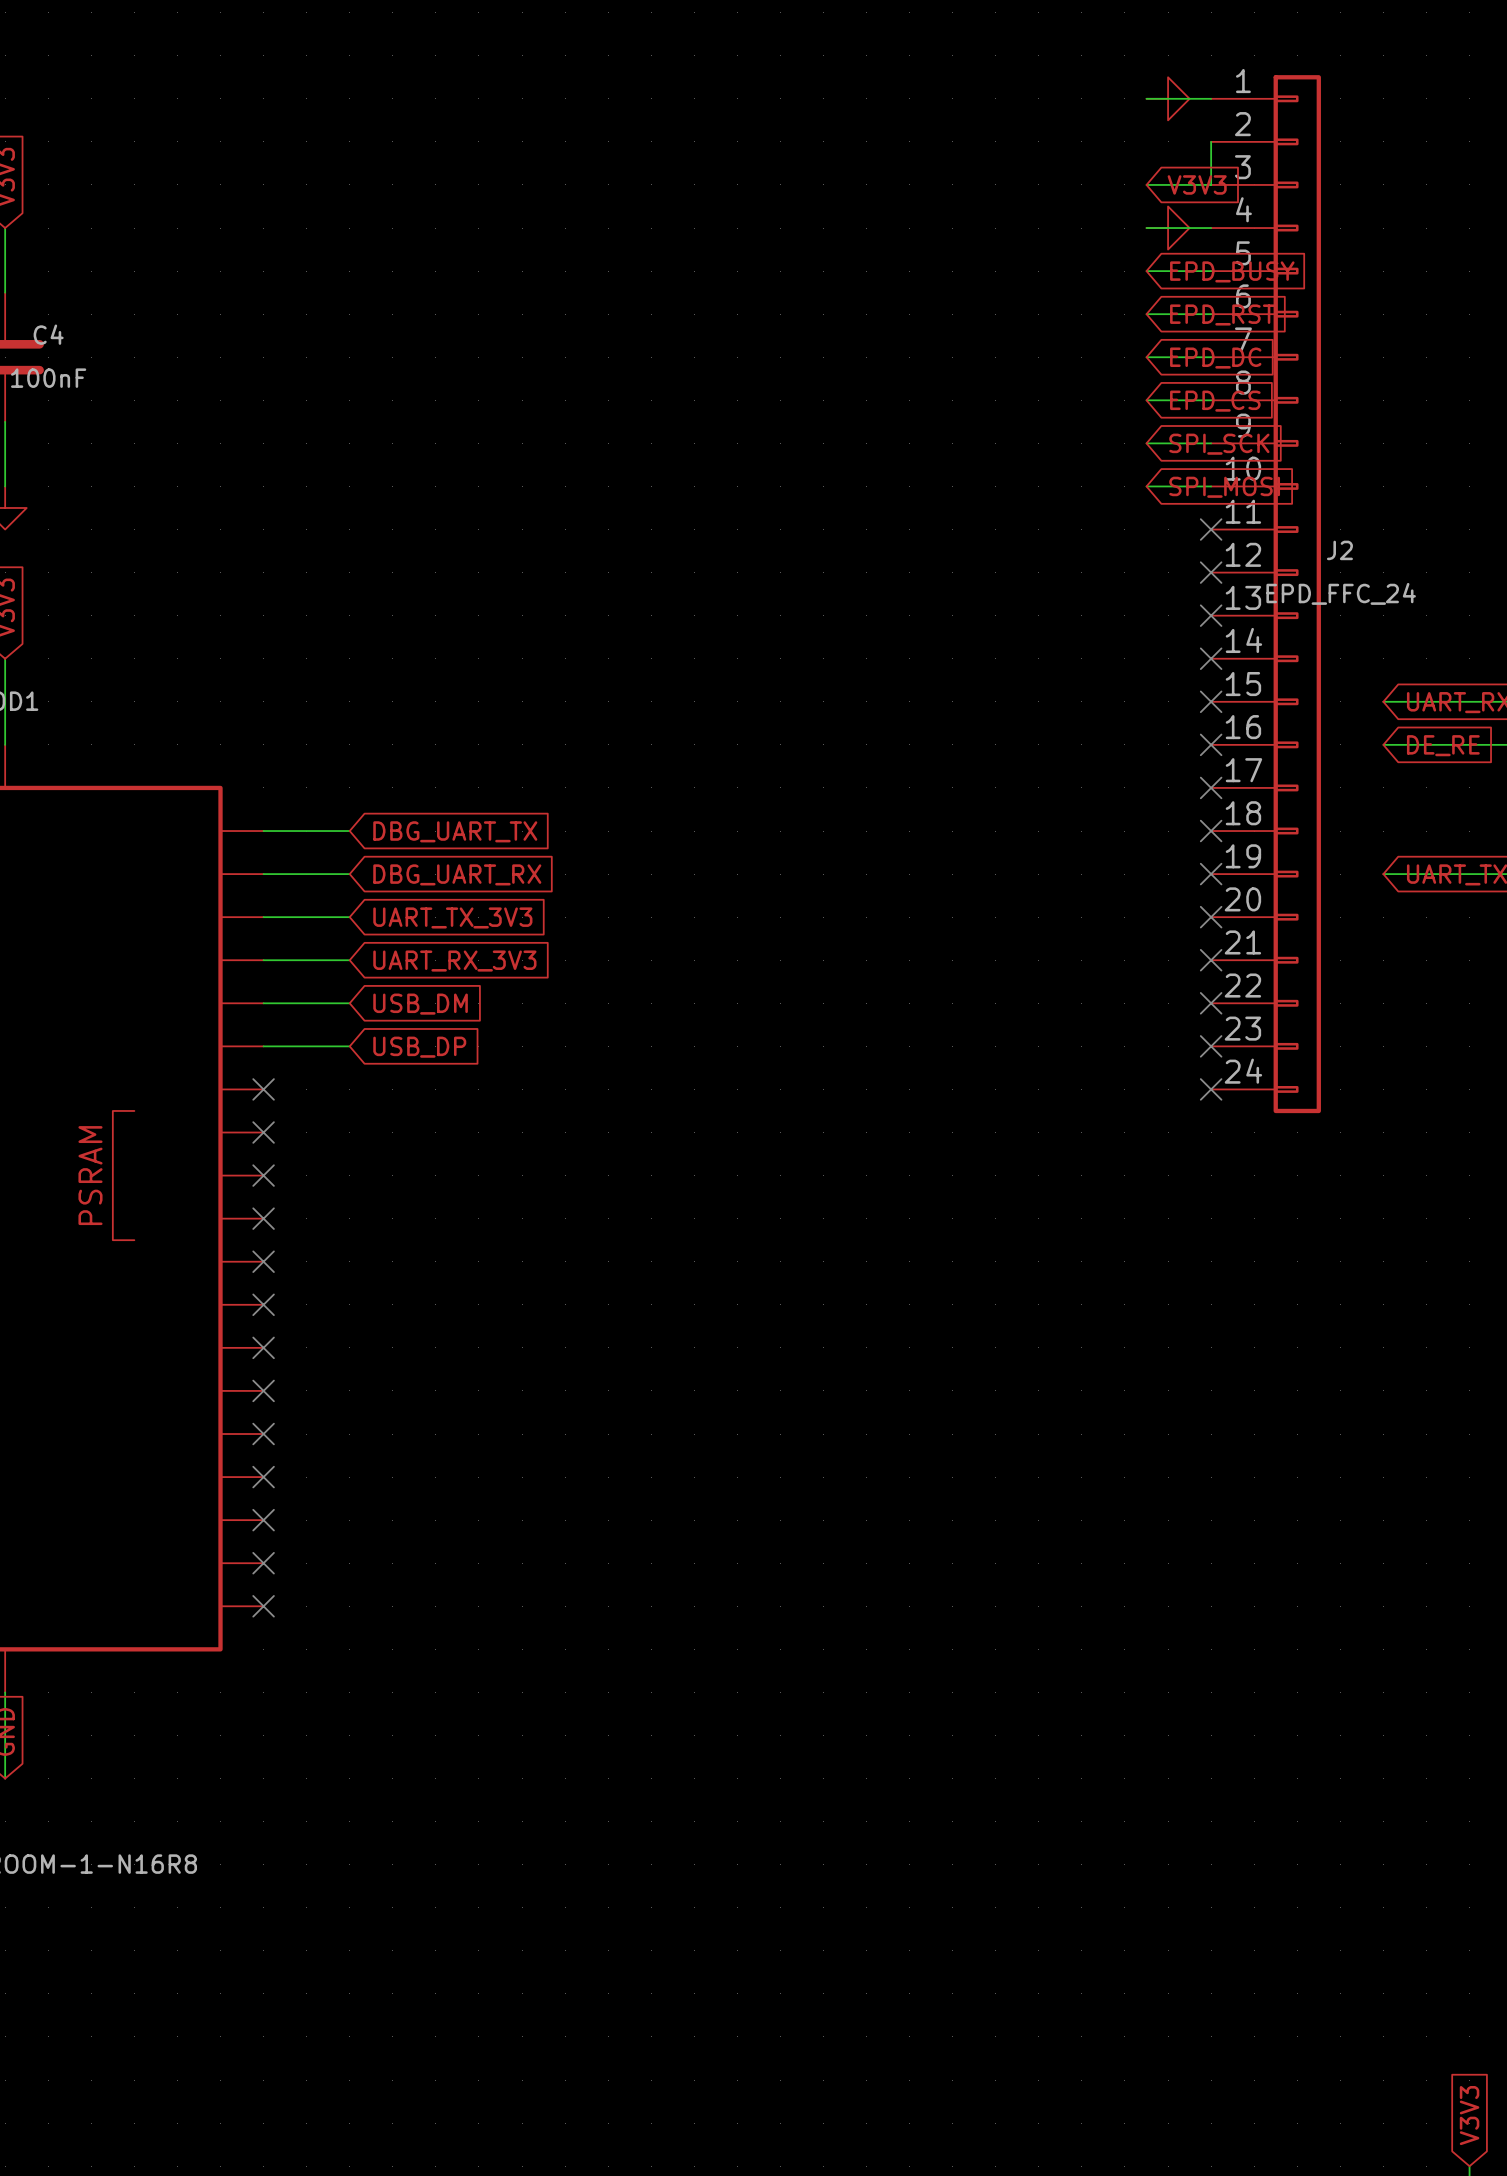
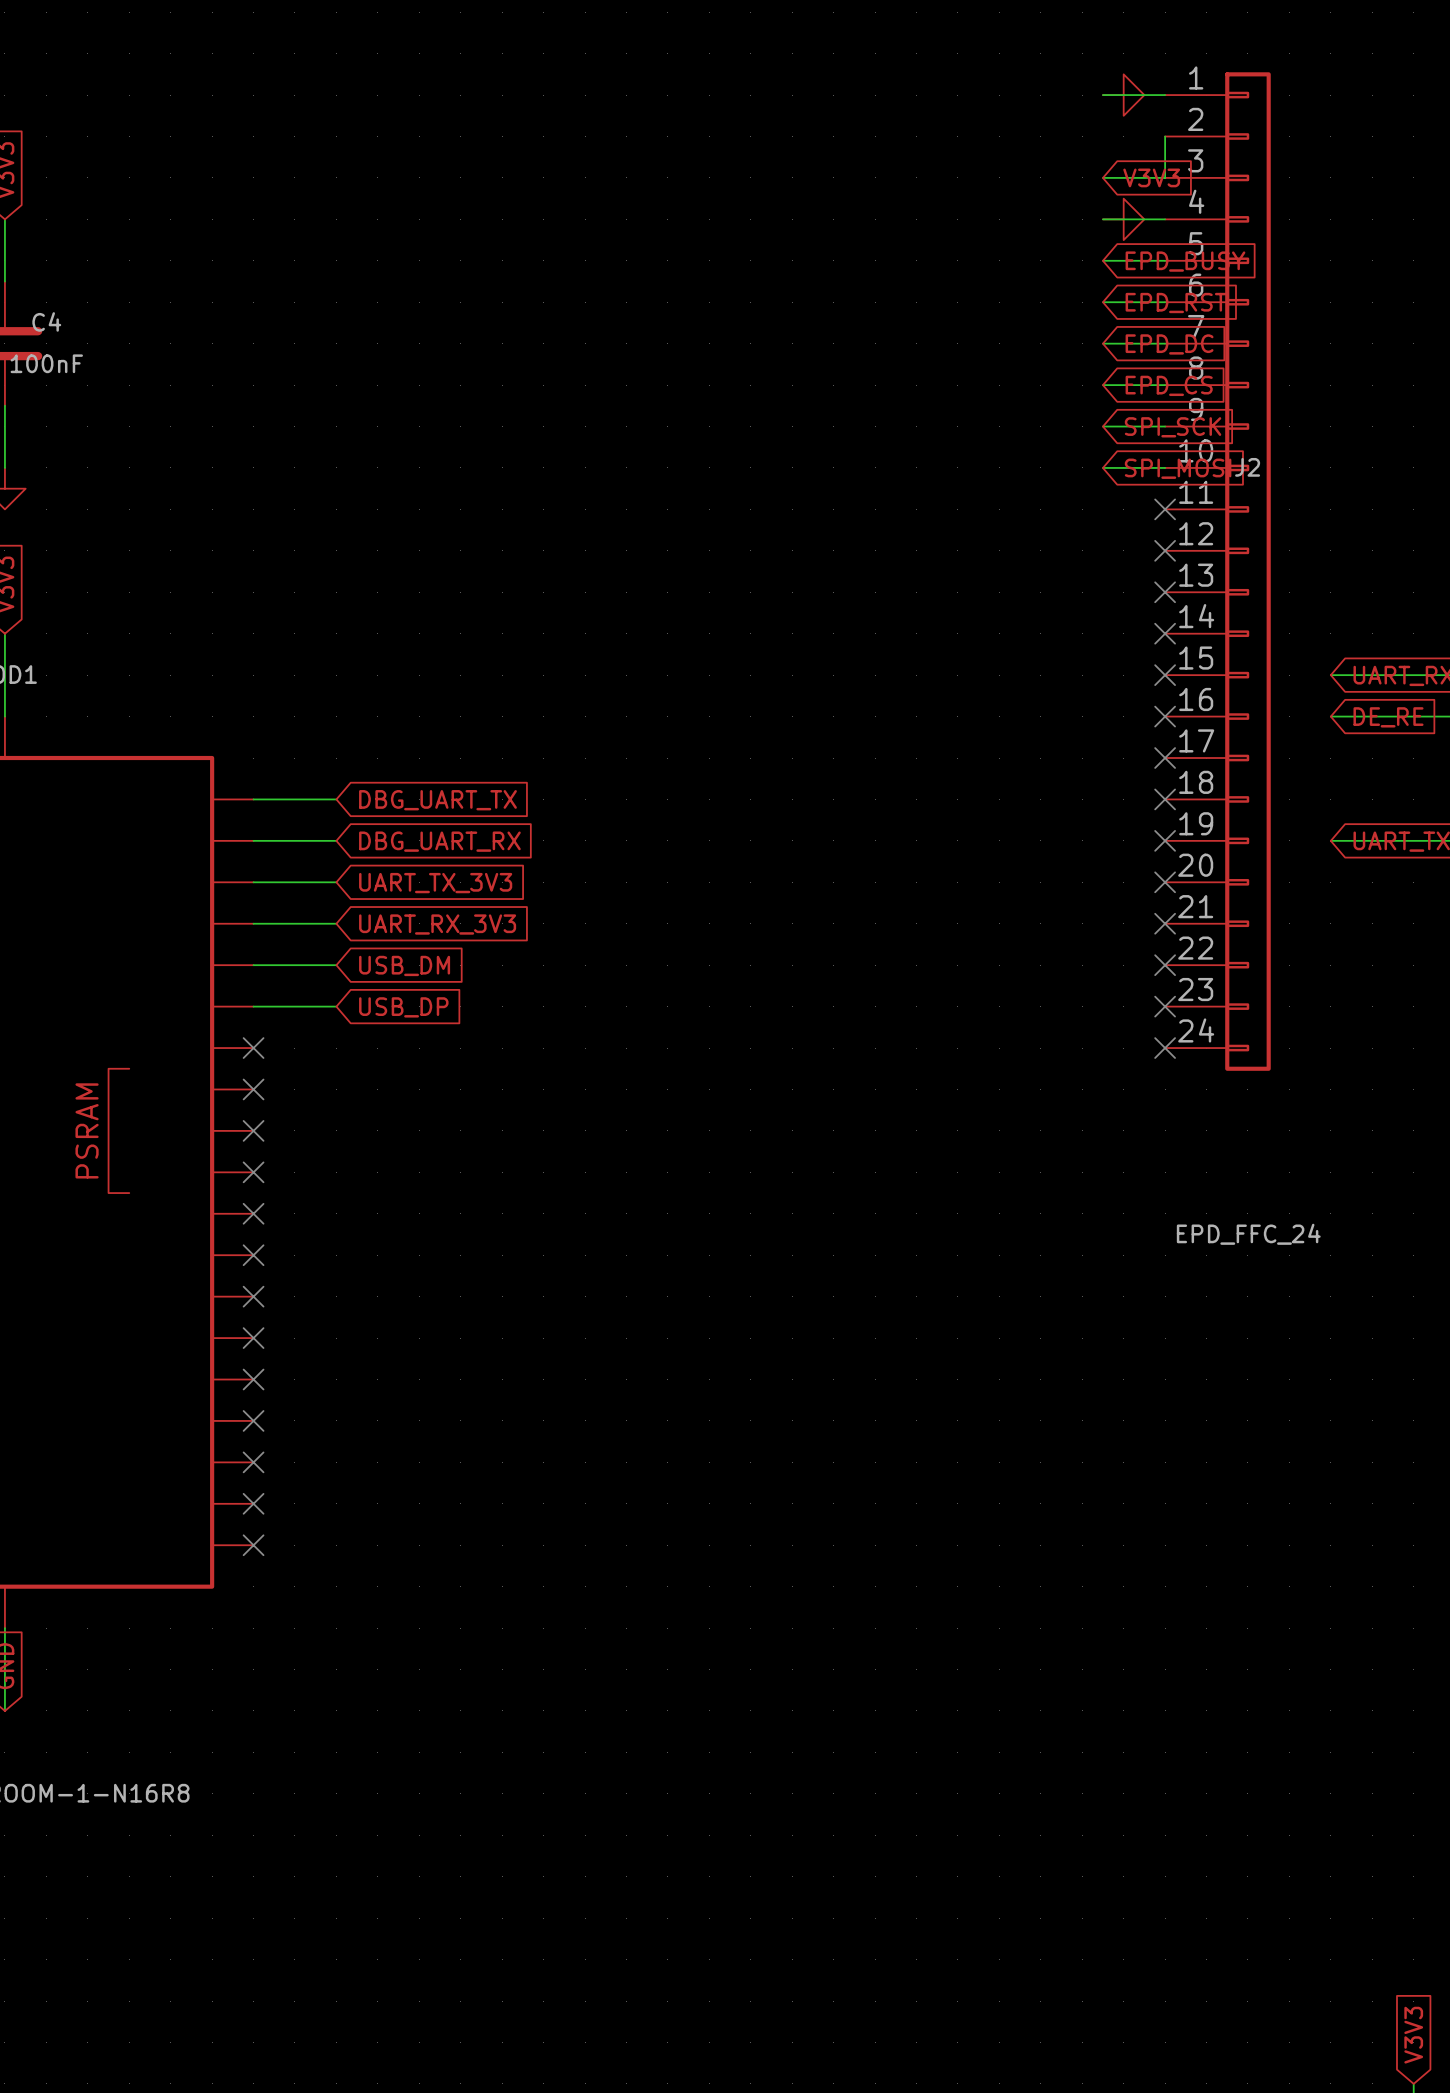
J2 name position: J2 (1339, 550) -> J2 (1247, 467)
J2 value position: EPD_FFC_24 (1341, 593) -> EPD_FFC_24 (1248, 1234)

